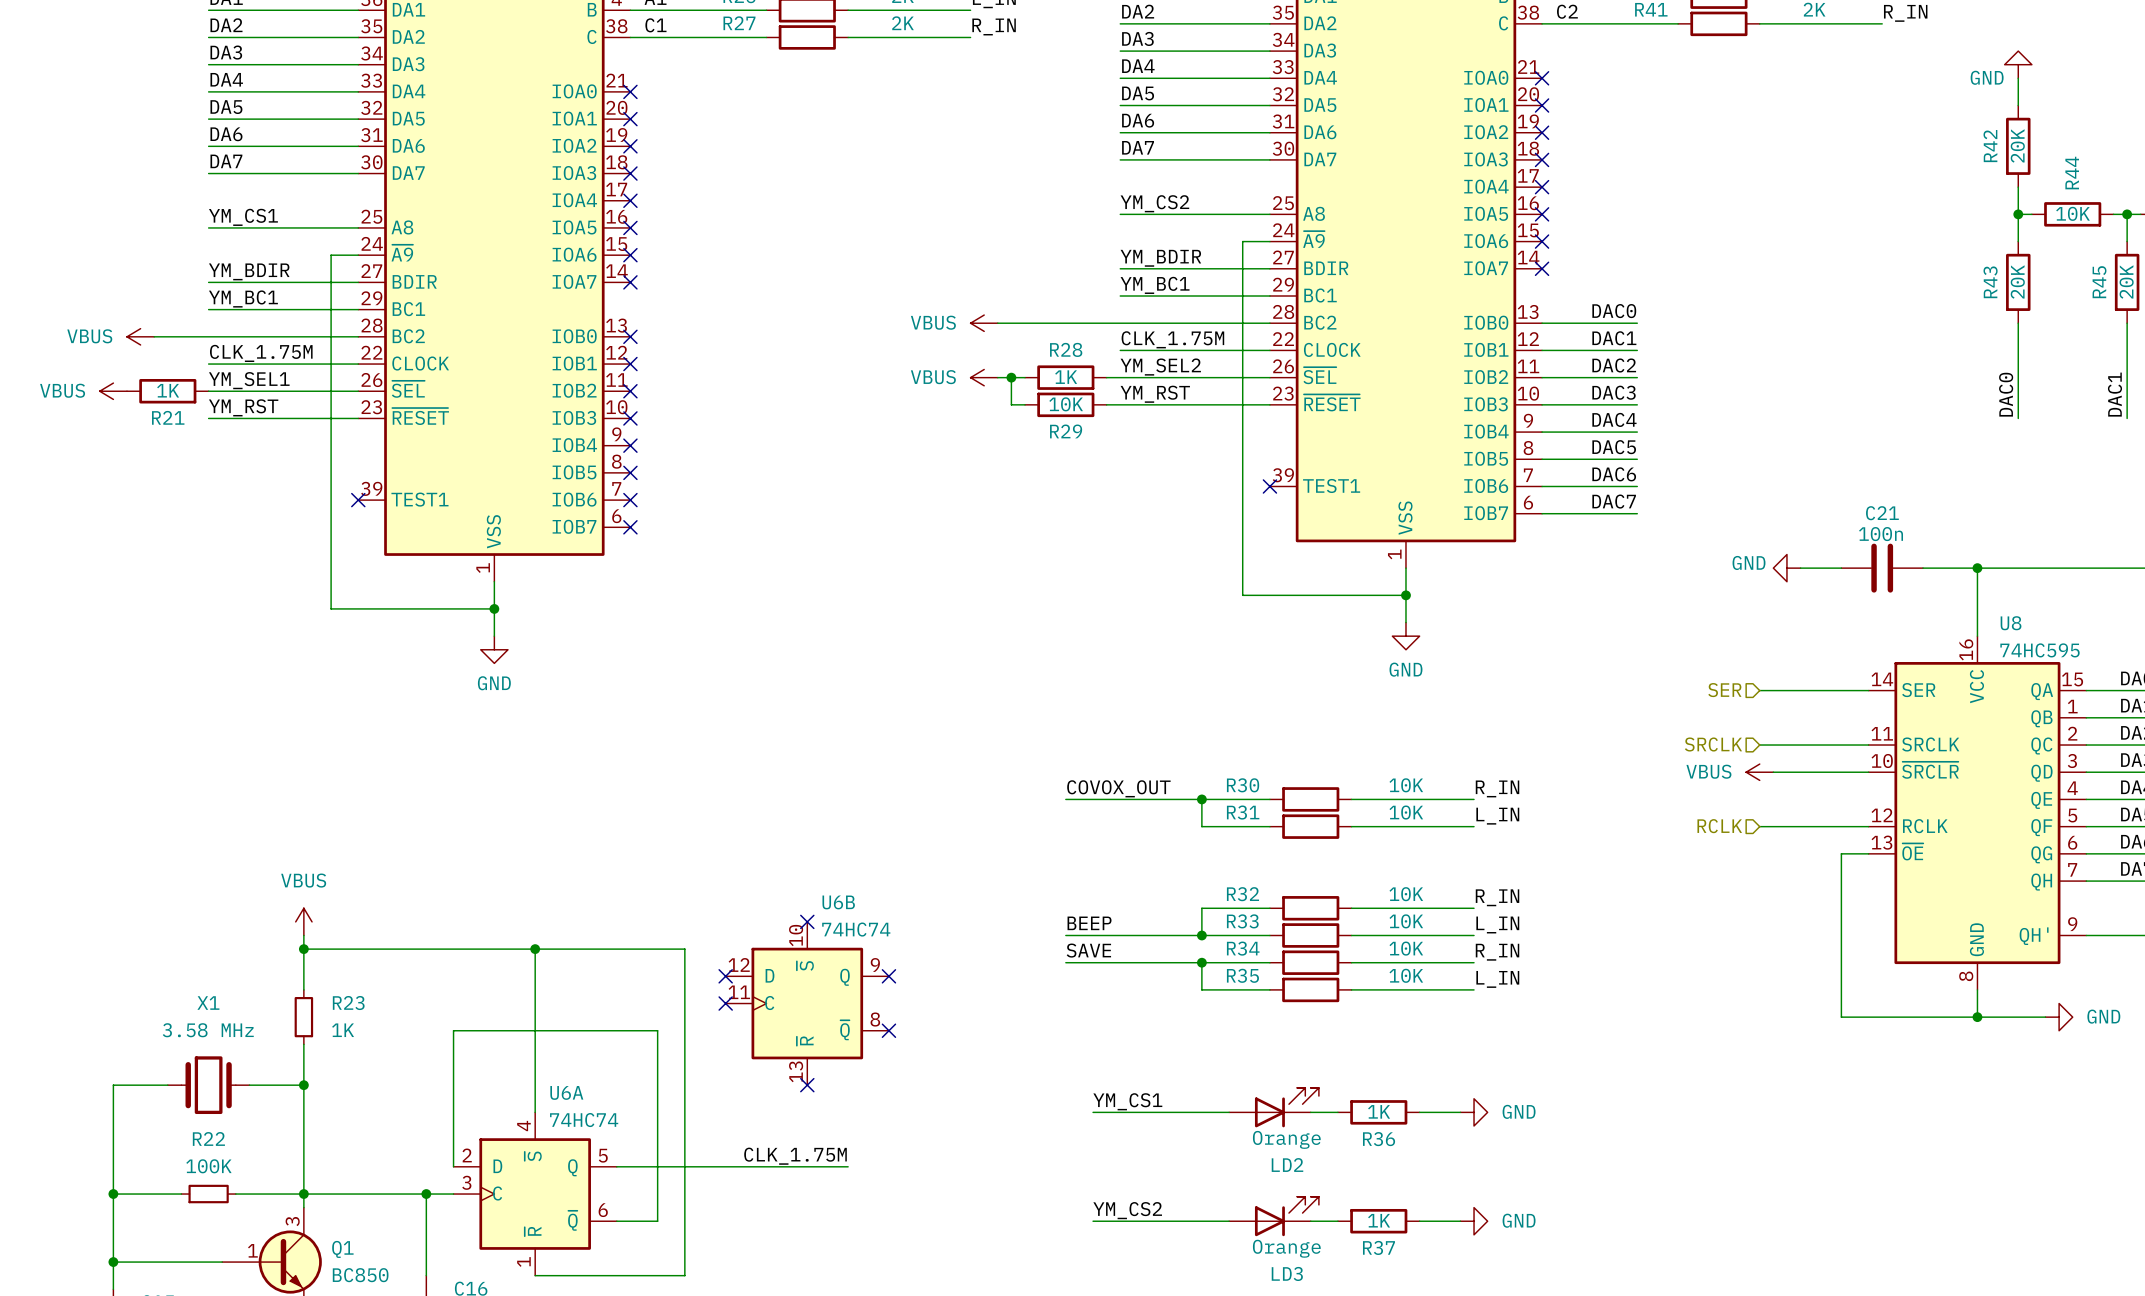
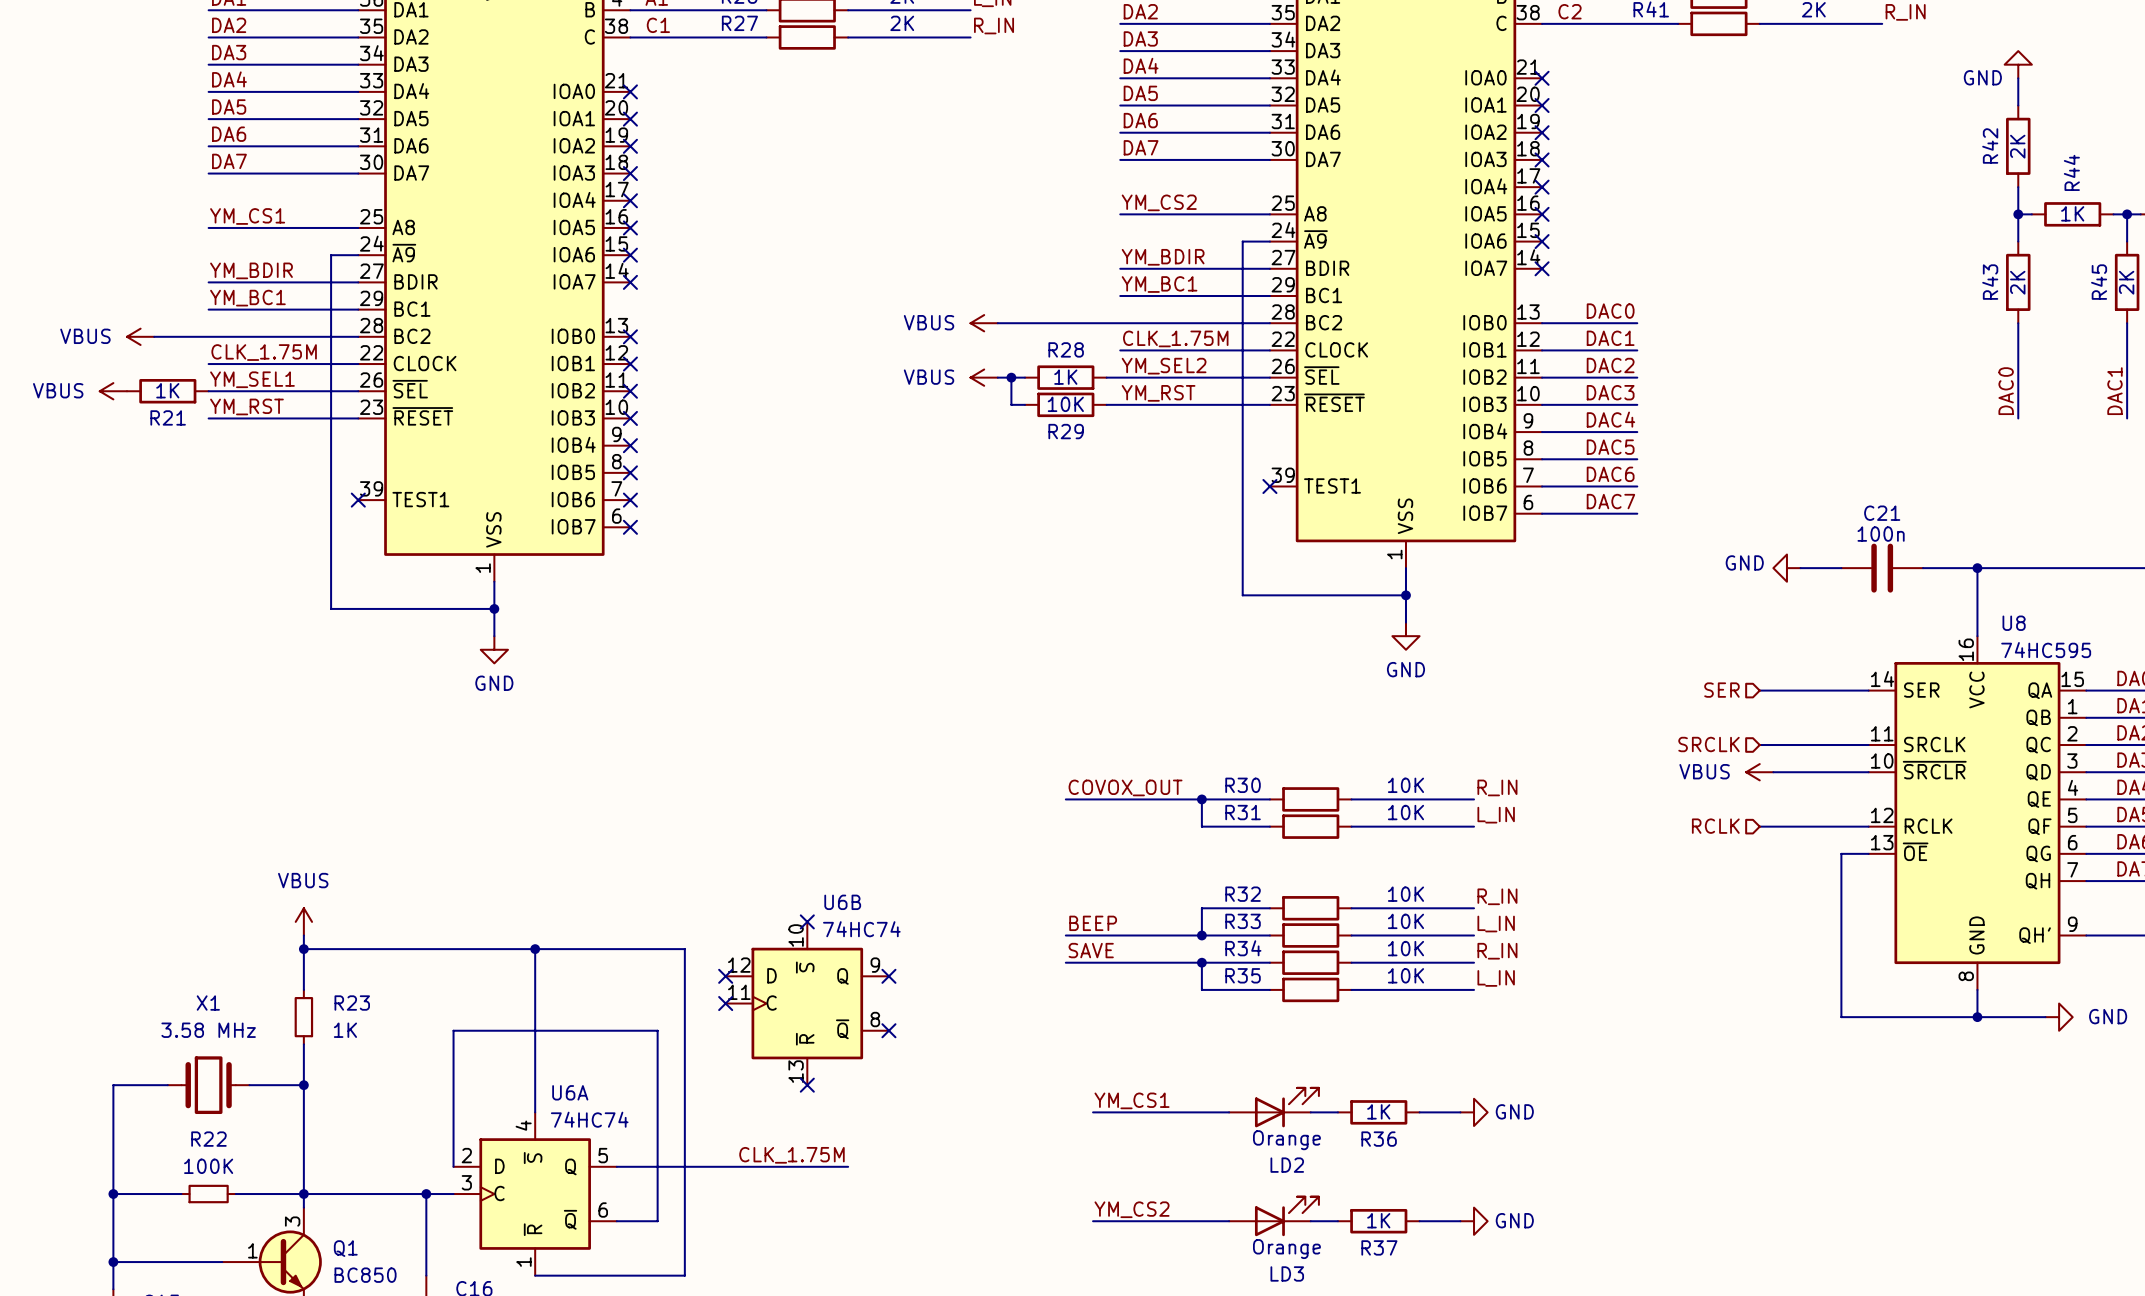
R42 value: 20K (2017, 145) -> 2K (2017, 146)
R44 value: 10K (2073, 213) -> 1K (2072, 213)
R43 value: 20K (2017, 281) -> 2K (2017, 282)
R45 value: 20K (2126, 281) -> 2K (2126, 282)

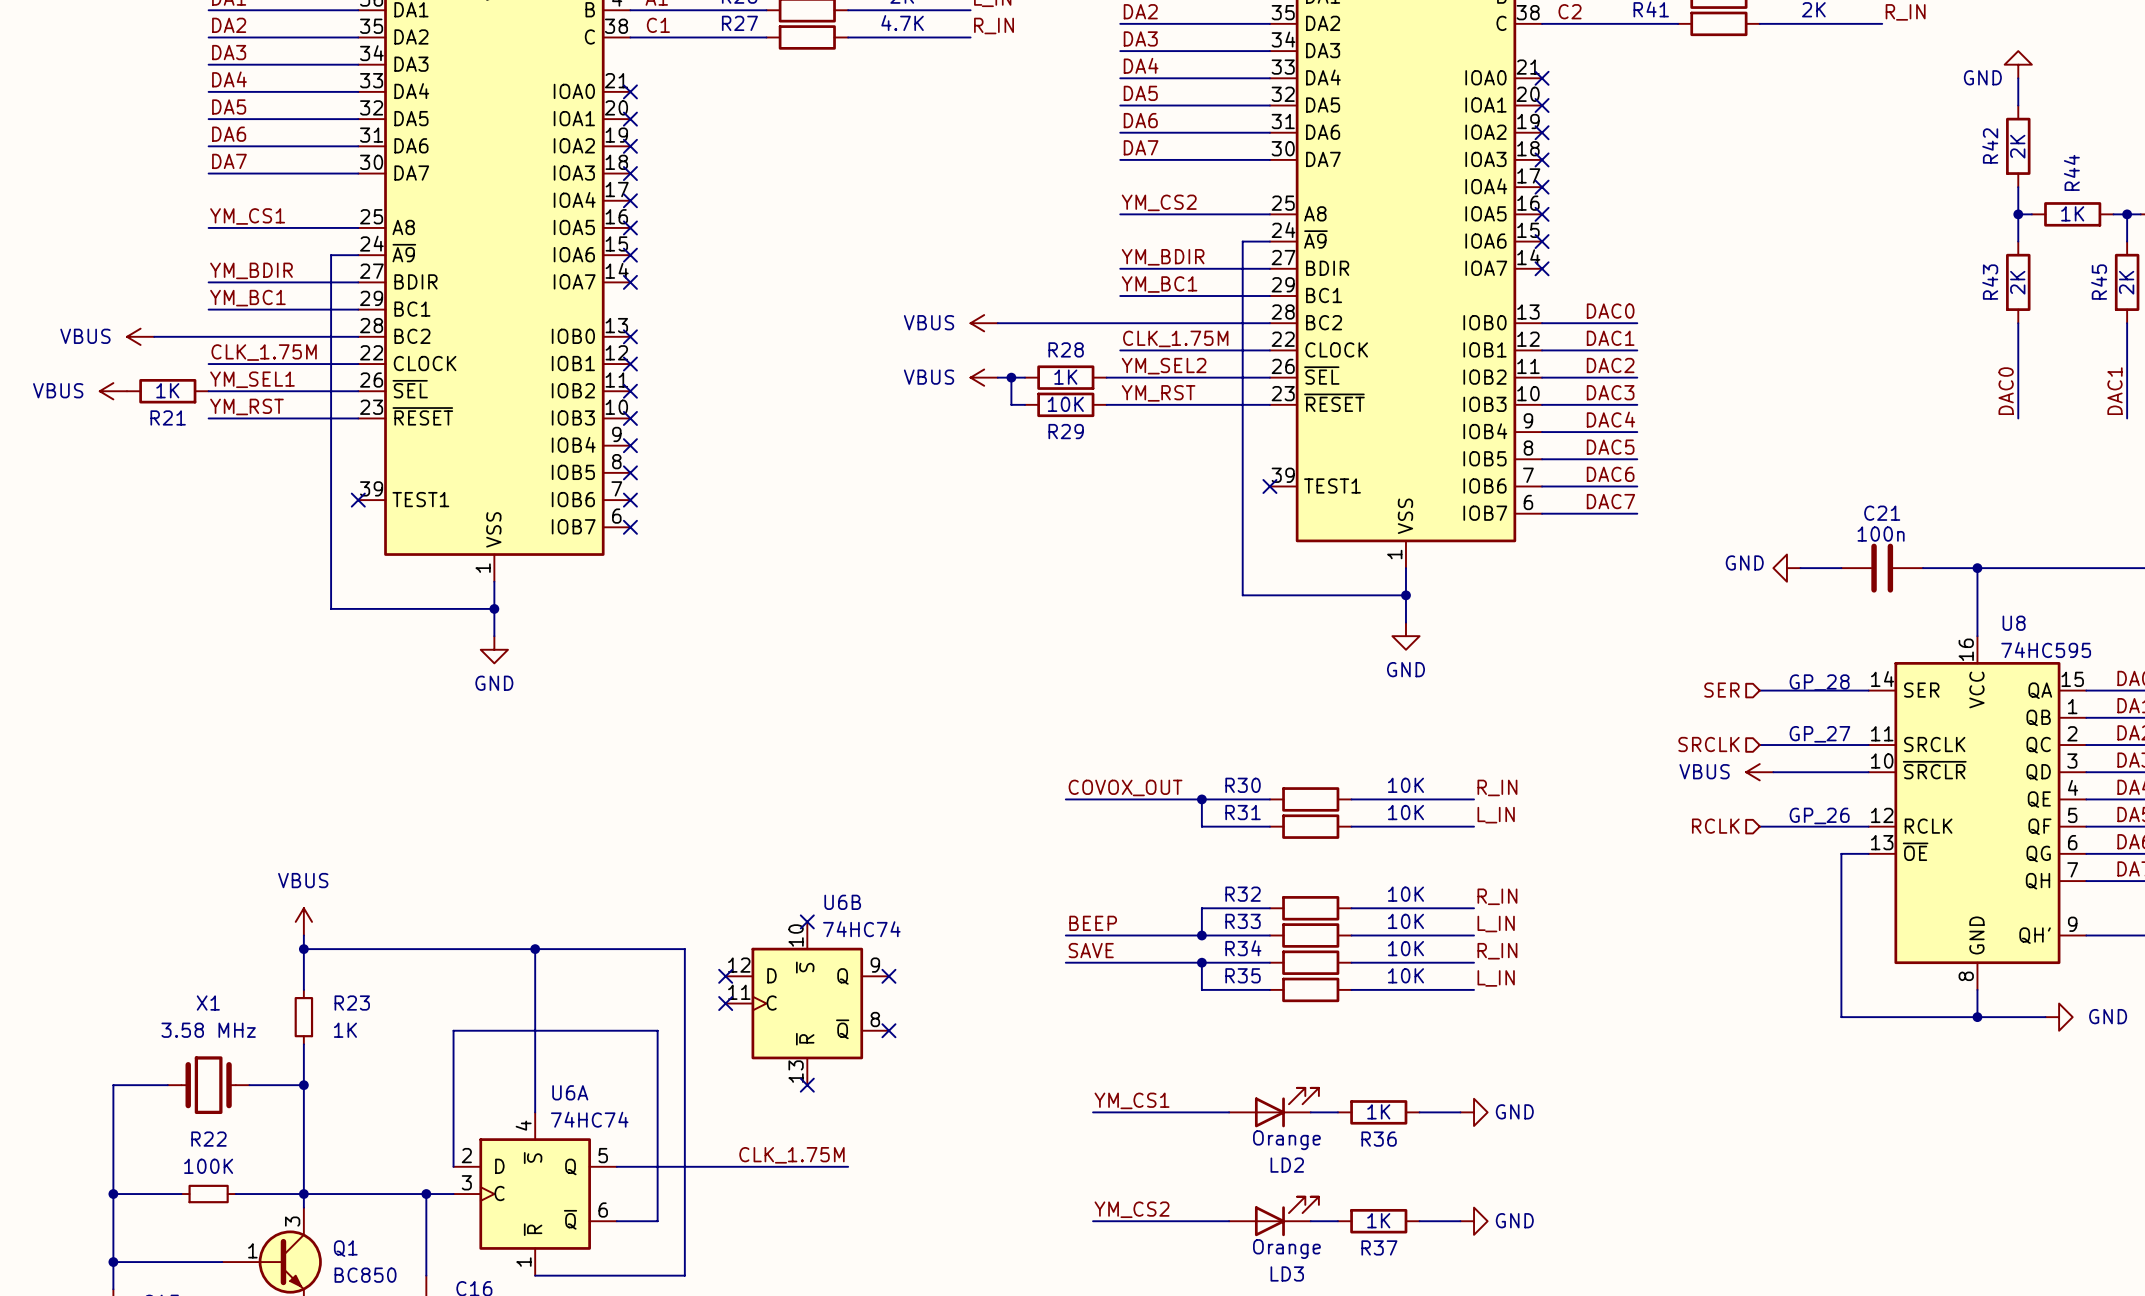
R27 value: 2K (902, 23) -> 4.7K (902, 23)
text: none -> GP_28 (1819, 682)
text: none -> GP_27 (1819, 734)
text: none -> GP_26 (1819, 815)

